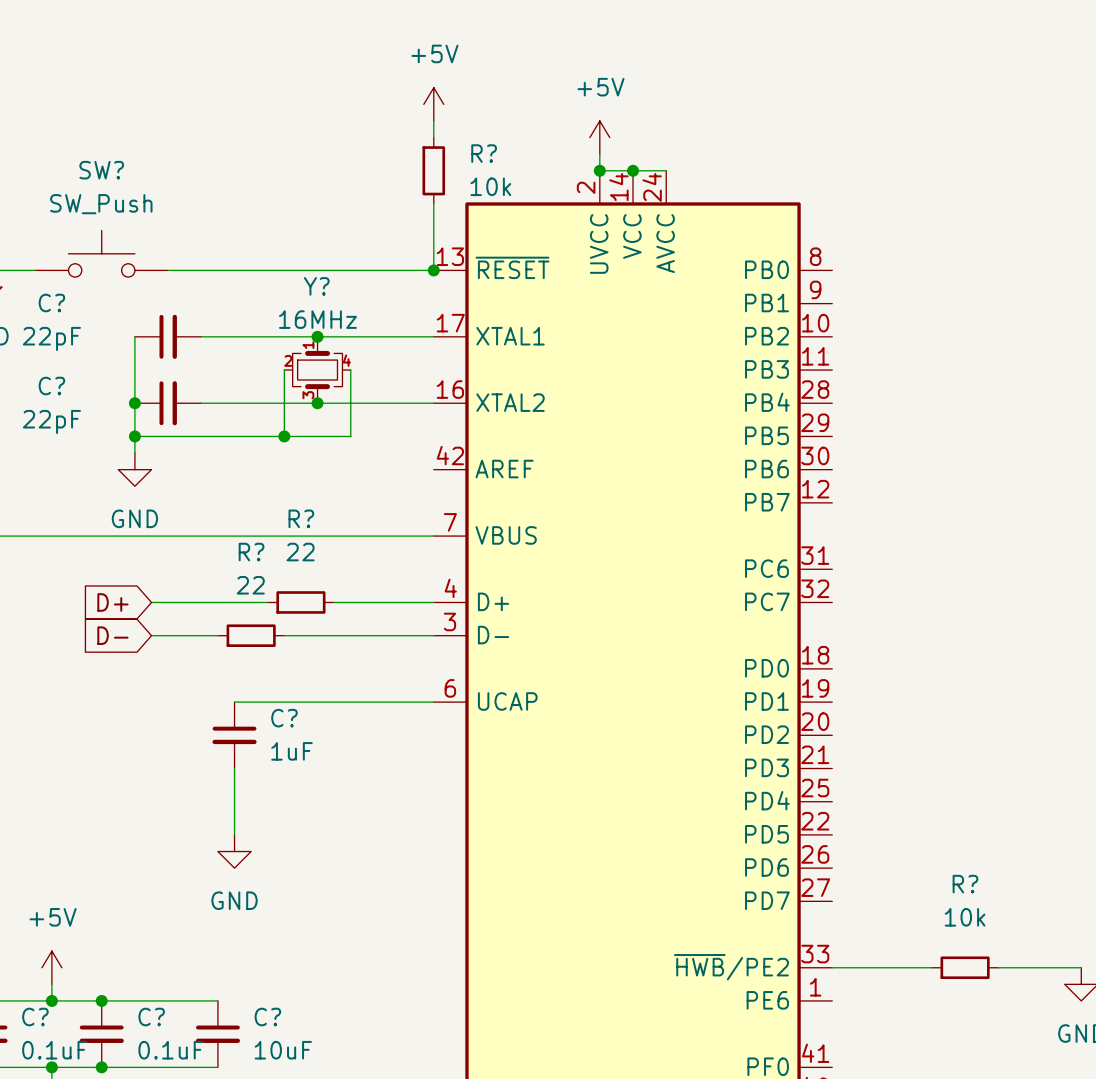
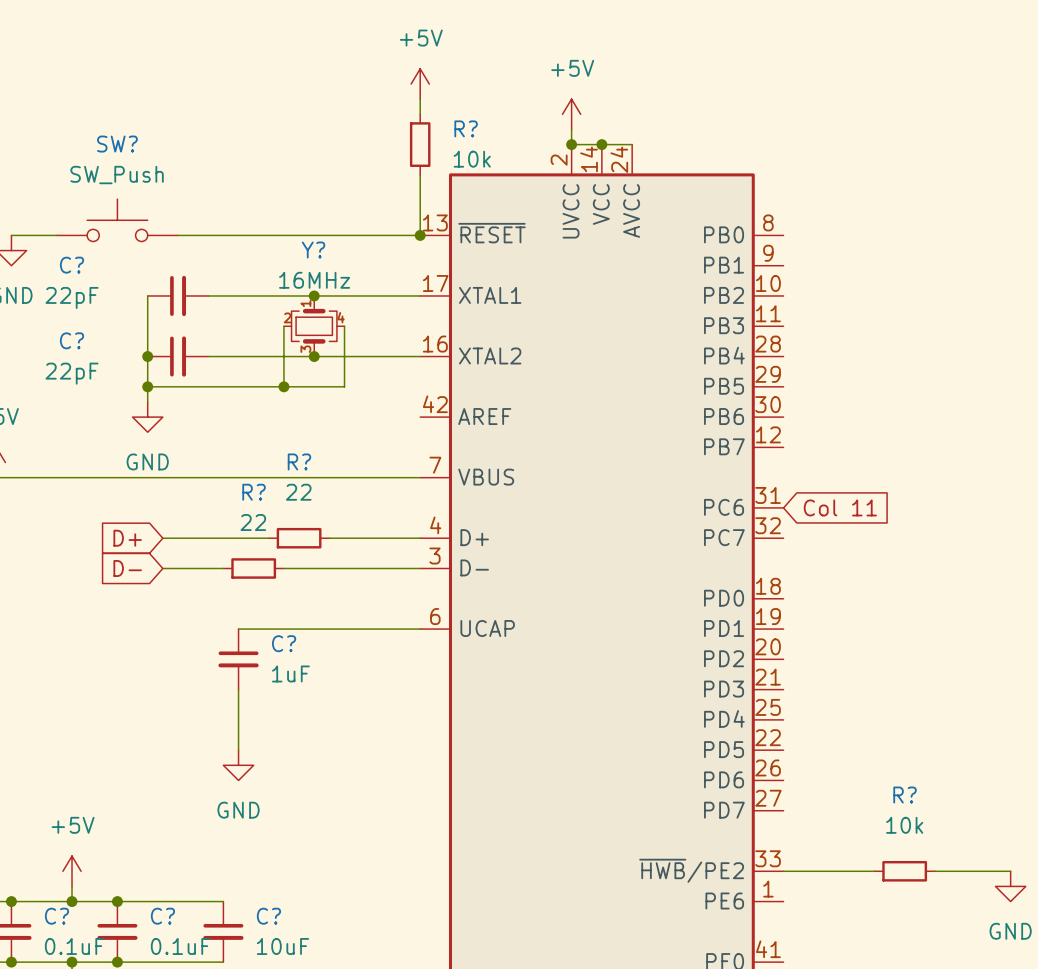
global label: none -> Col 11 (840, 507)

